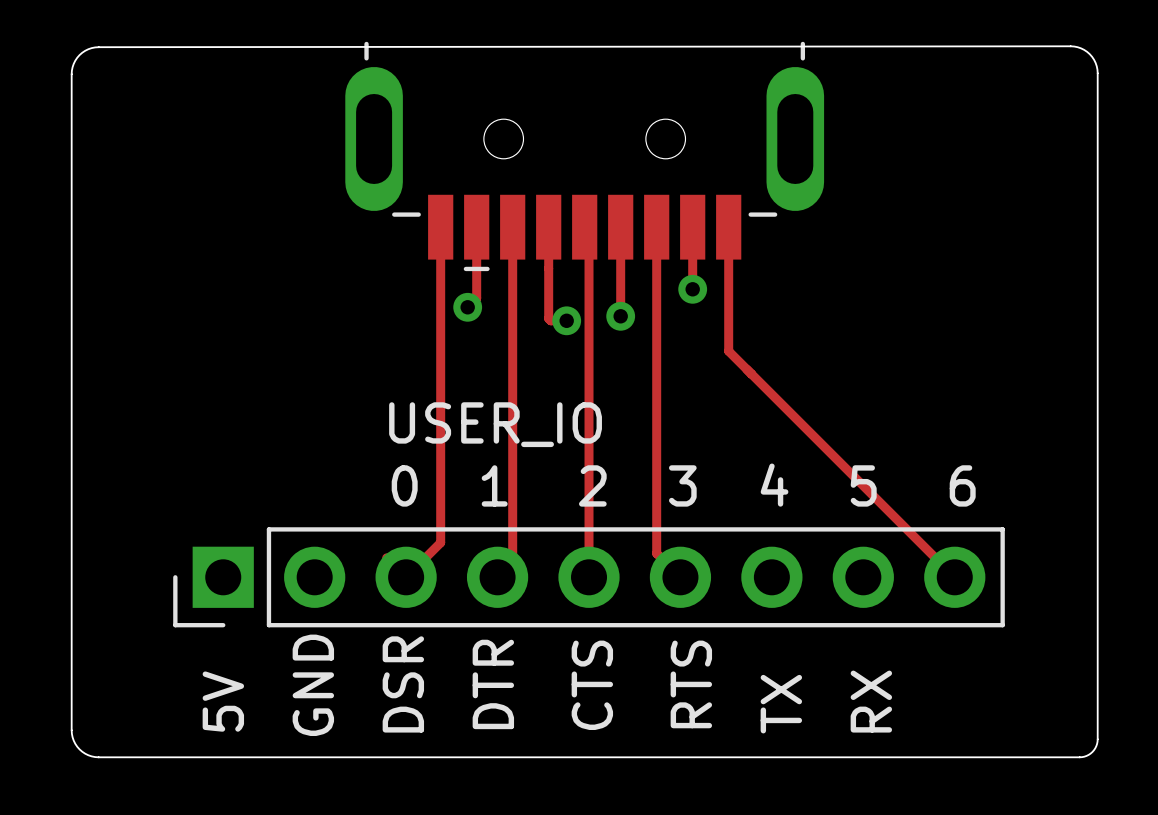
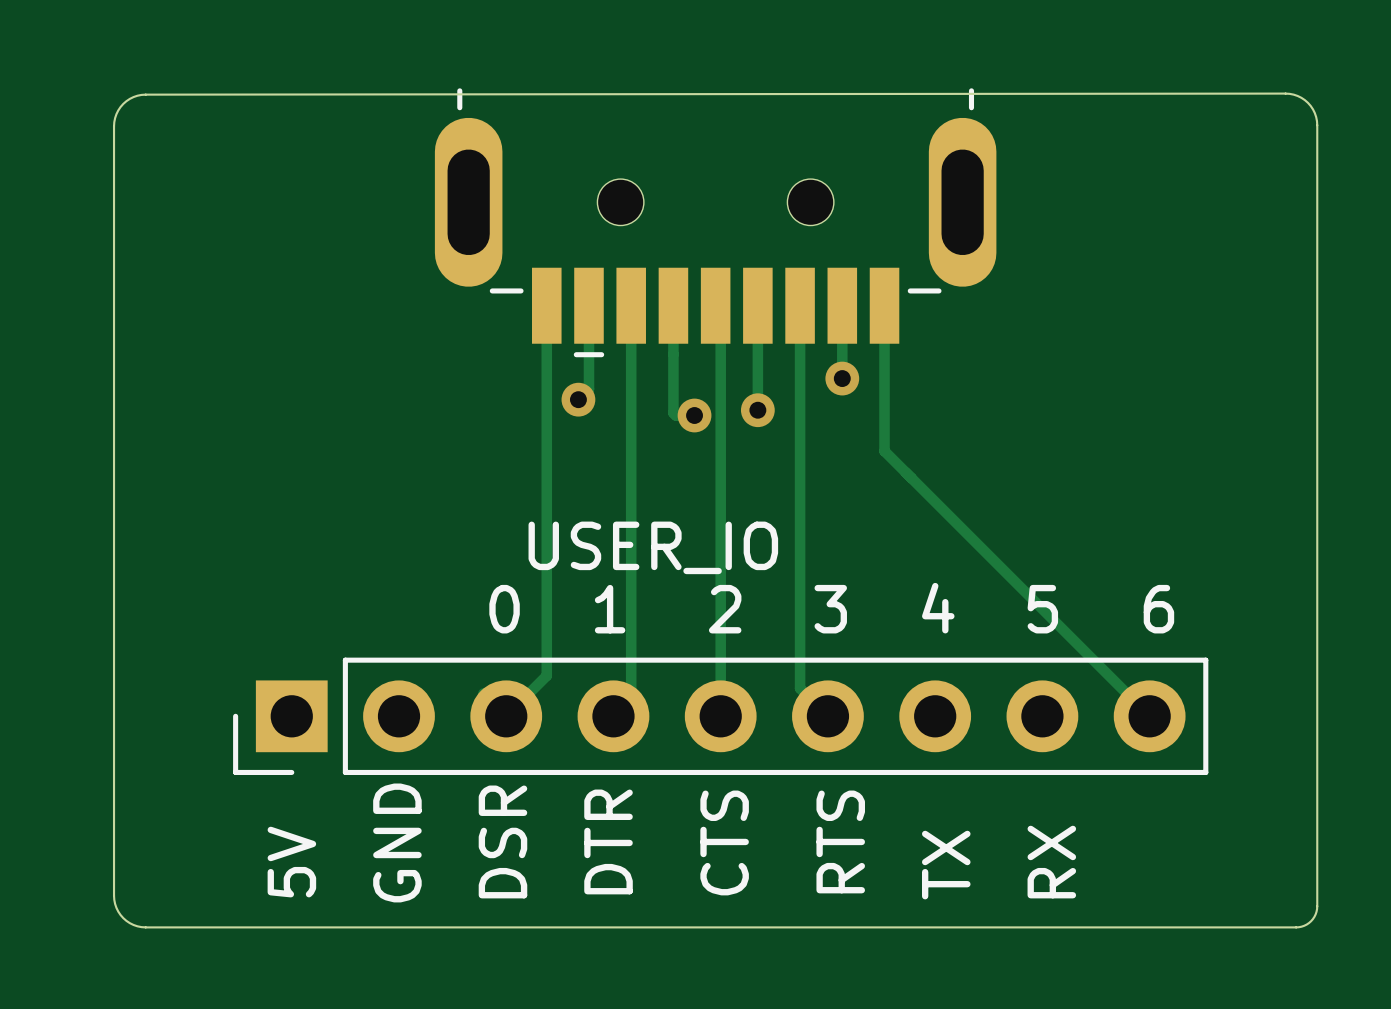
text position: USER_IO (495, 424) -> USER_IO (653, 547)

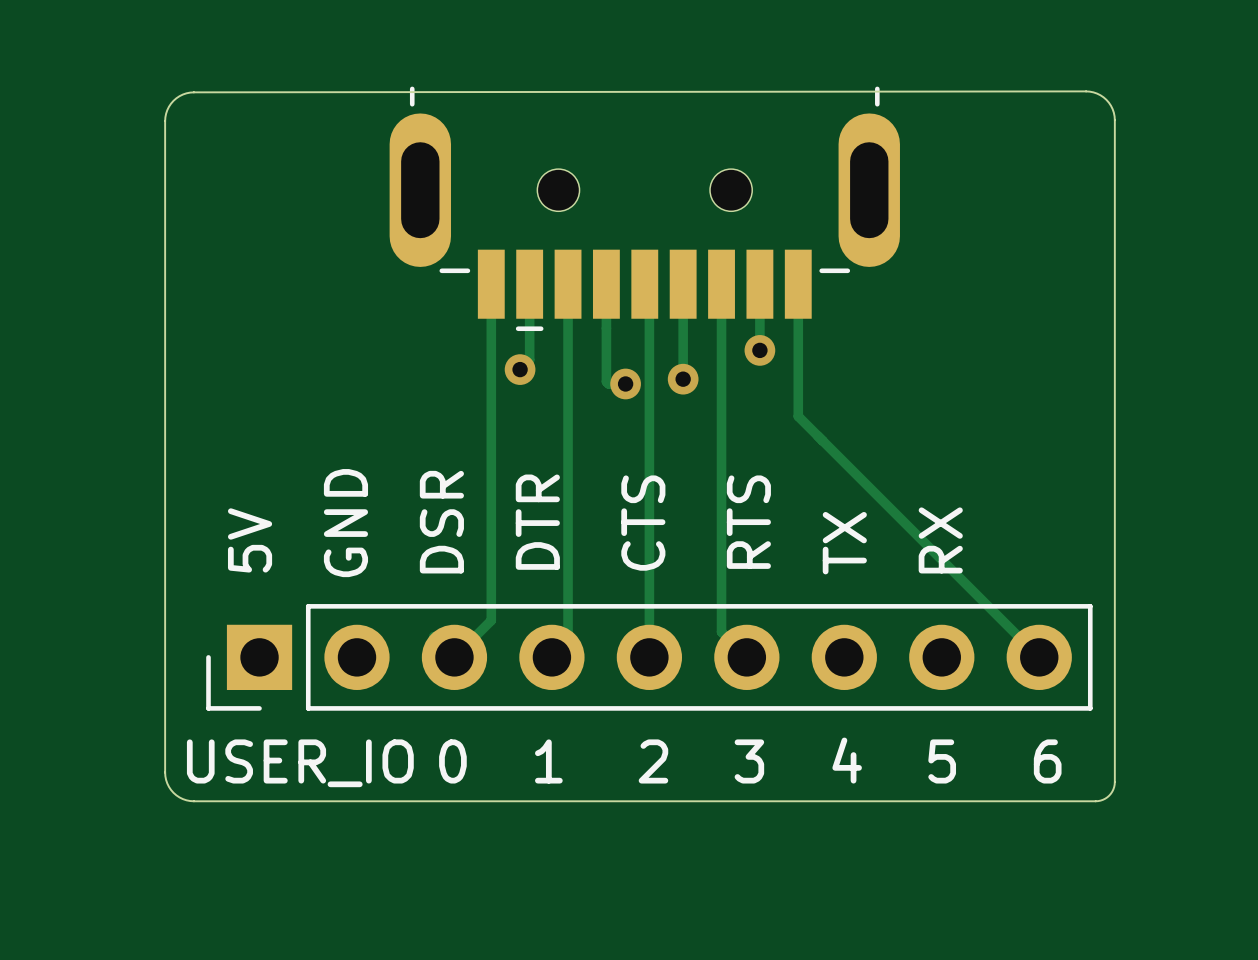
board edge: (1285, 93) (145, 94) (133, 97) (126, 101) (116, 114) (114, 126) (114, 895) (115, 903) (120, 915) (133, 924) (145, 927) (1296, 927) (1309, 923) (1314, 916) (1317, 906) (1317, 125) (1314, 113) (1307, 102) (1297, 95) (1285, 93) -> (1086, 91) (193, 92) (176, 98) (167, 110) (165, 121) (165, 772) (171, 790) (182, 799) (193, 801) (1095, 801) (1107, 797) (1112, 791) (1114, 782) (1114, 120) (1112, 109) (1106, 99) (1097, 93) (1086, 91)
text position: USER_IO (653, 547) -> USER_IO (300, 763)
text position: 4 (938, 608) -> 4 (847, 760)
text position: 0 (504, 609) -> 0 (452, 761)
text position: 1 (610, 609) -> 1 (548, 761)
text position: 2 (725, 609) -> 2 (653, 761)
text position: 3 (830, 609) -> 3 (749, 761)
text position: 5 (1042, 609) -> 5 (942, 761)
text position: 6 (1158, 609) -> 6 (1047, 761)
text position: DSR (502, 841) -> DSR (441, 522)
text position: DTR (608, 841) -> DTR (537, 522)
text position: RTS (840, 841) -> RTS (748, 522)
text position: GND (397, 842) -> GND (345, 523)
text position: CTS (724, 842) -> CTS (643, 523)
text position: 5V (291, 862) -> 5V (250, 540)
text position: RX (1051, 862) -> RX (940, 540)
text position: TX (946, 865) -> TX (844, 543)

